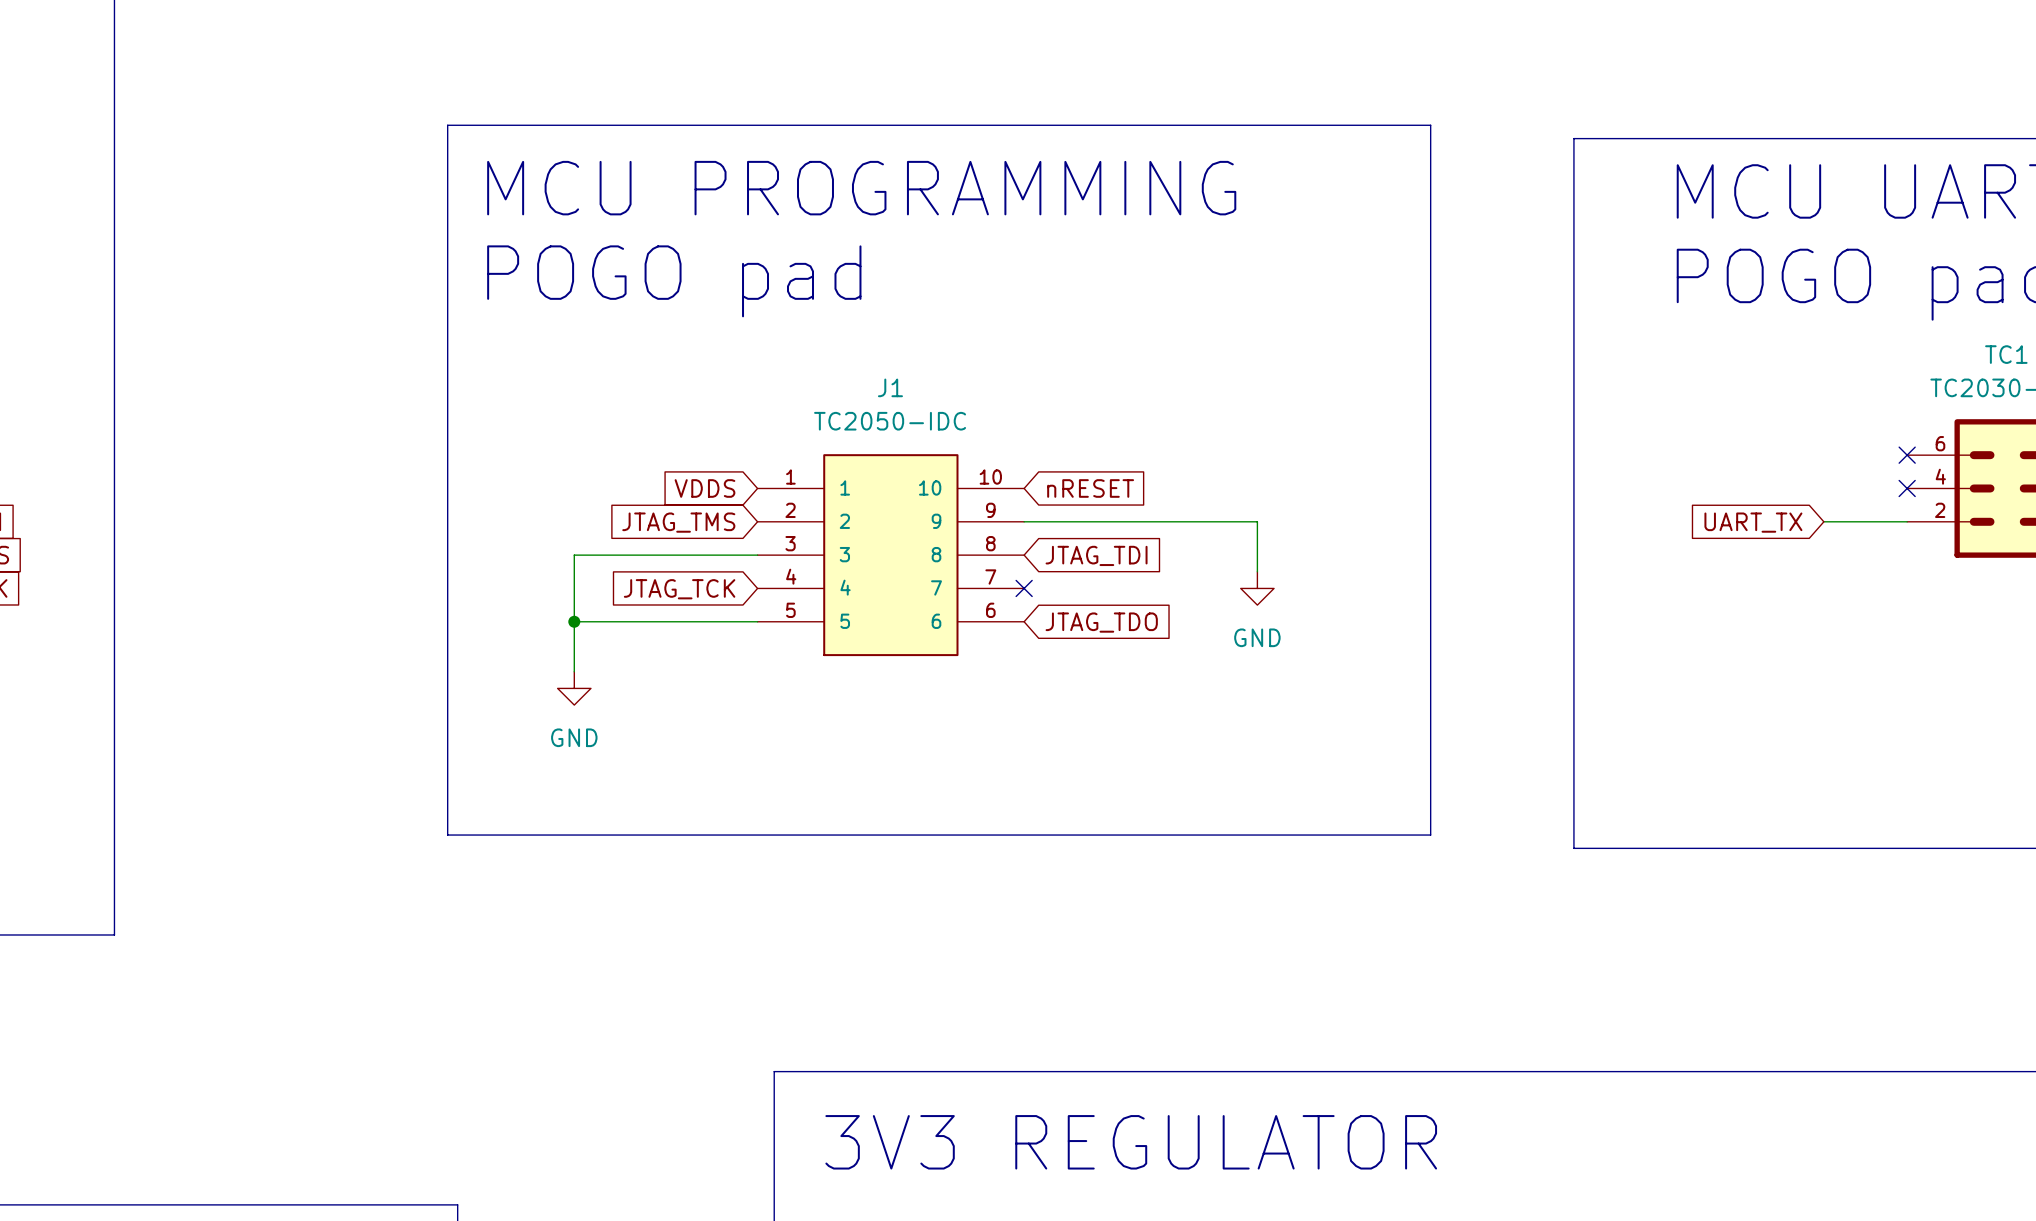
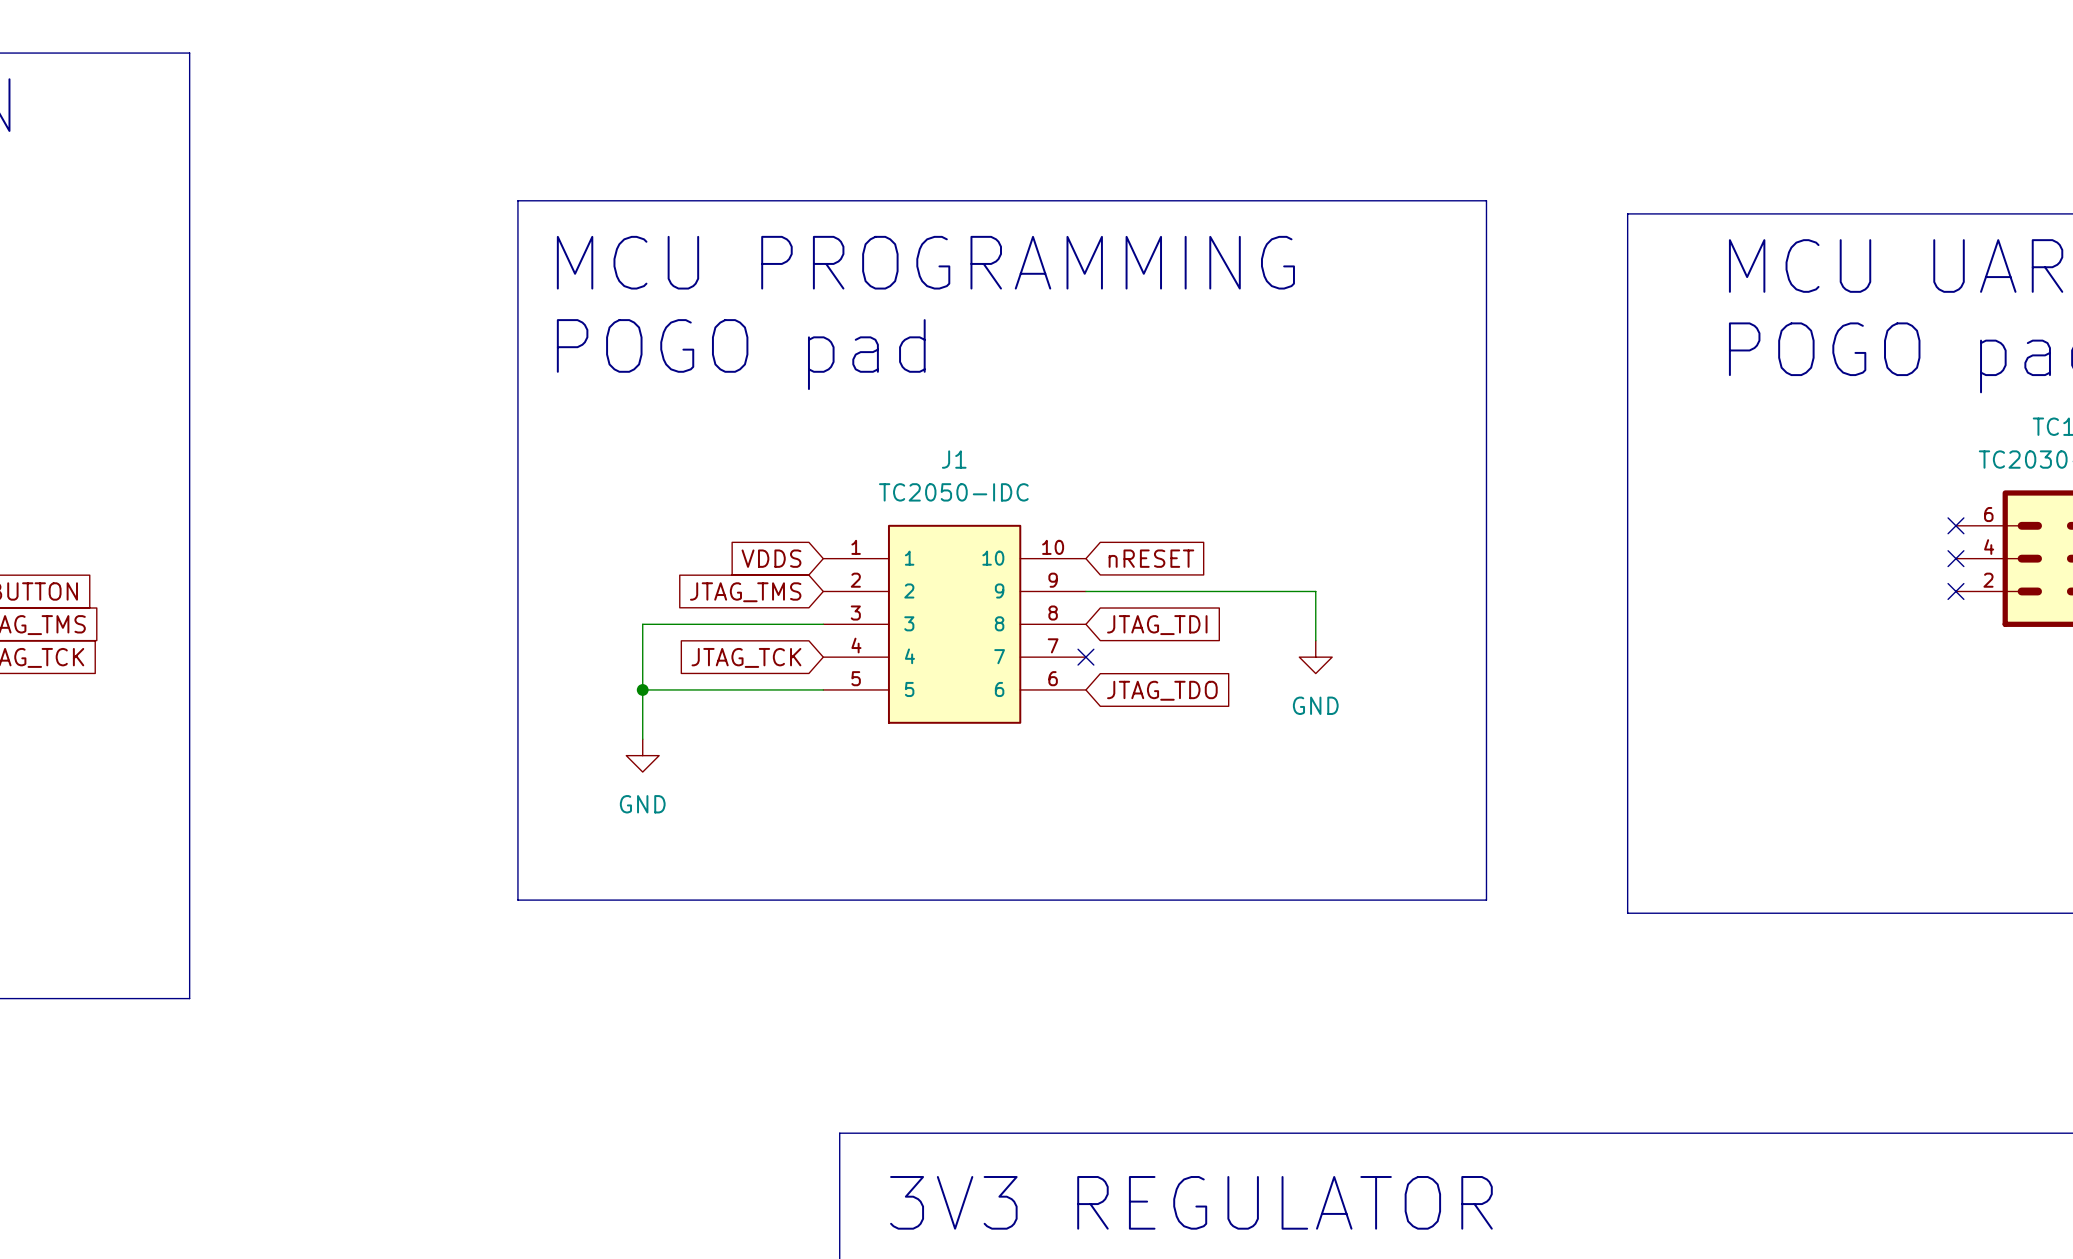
wire: (1823, 521) (1907, 521) -> none
no-connect mark: none -> (1955, 591)
global label: UART_TX (1753, 522) -> none

